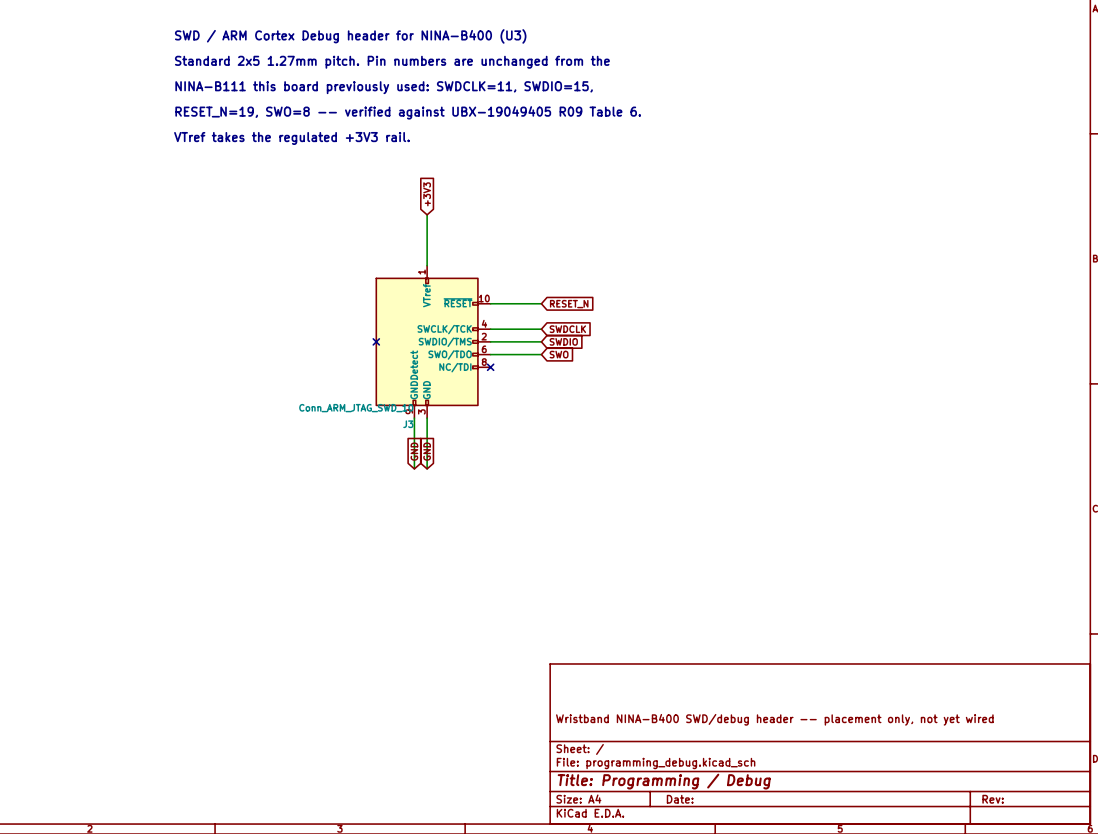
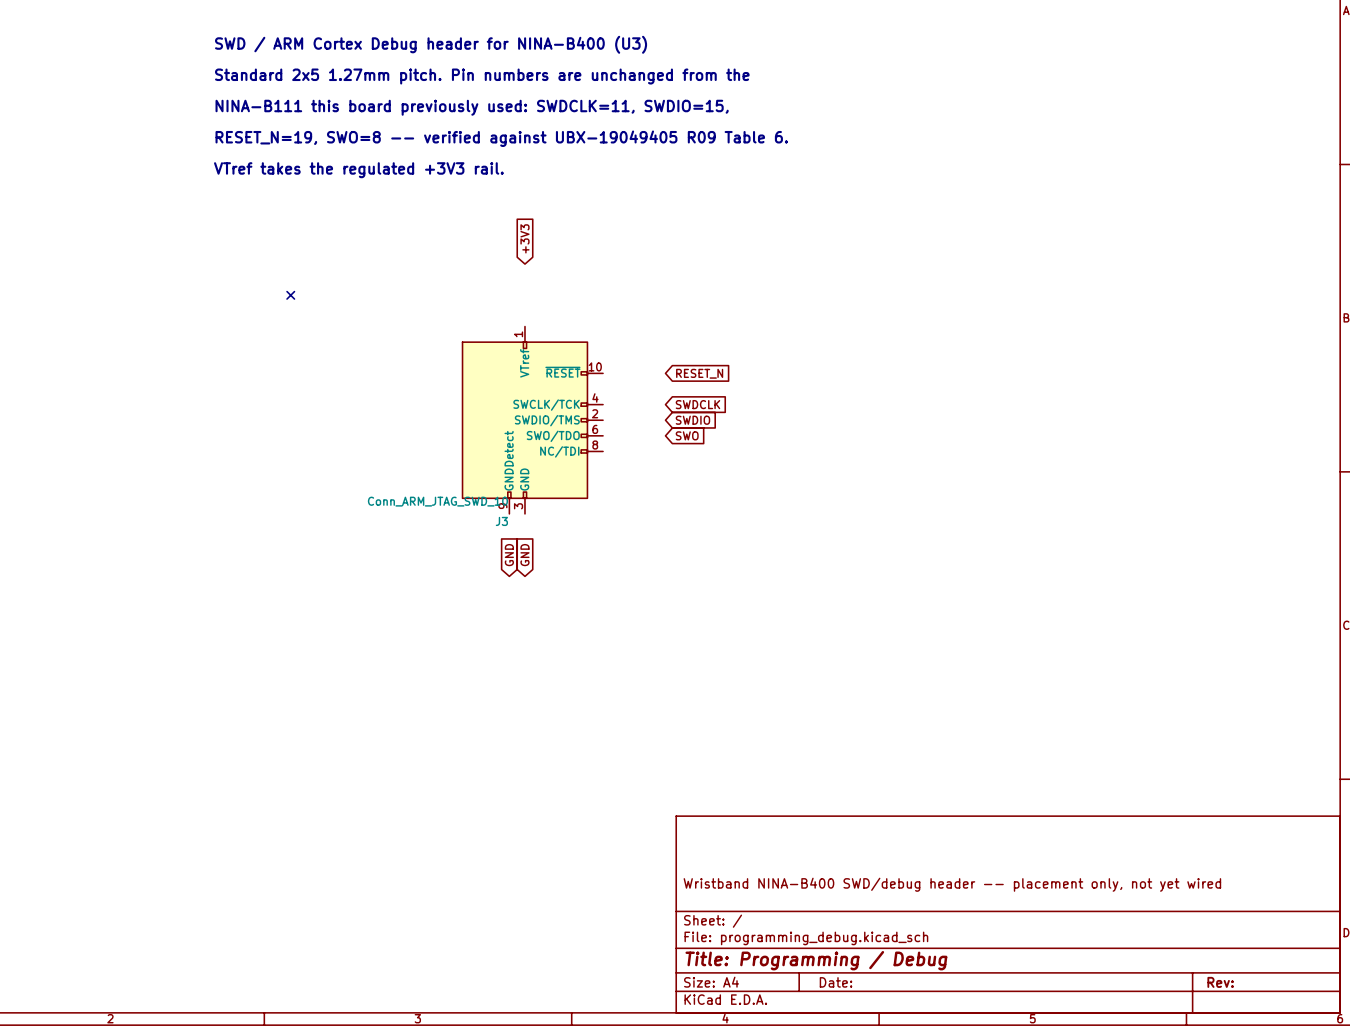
wire: (427, 214) (427, 265) -> none
no-connect mark: none -> (290, 295)
wire: (490, 303) (541, 303) -> none
wire: (490, 329) (541, 329) -> none
no-connect mark: (376, 341) -> none
wire: (490, 341) (541, 341) -> none
wire: (490, 354) (541, 354) -> none
no-connect mark: (490, 367) -> none
wire: (414, 418) (414, 468) -> none
wire: (427, 418) (427, 468) -> none

